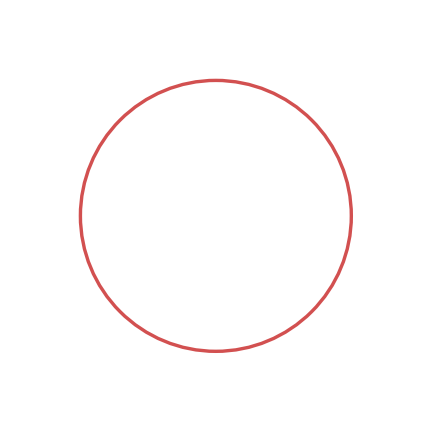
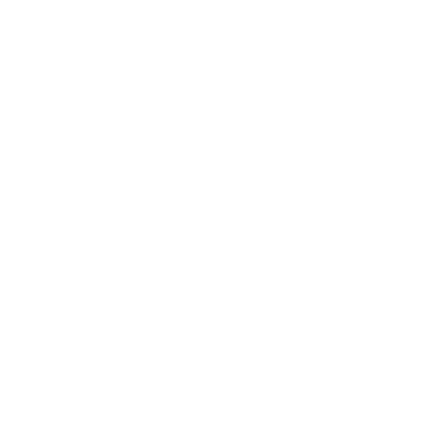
drawing: [78, 78, 354, 354] -> none

